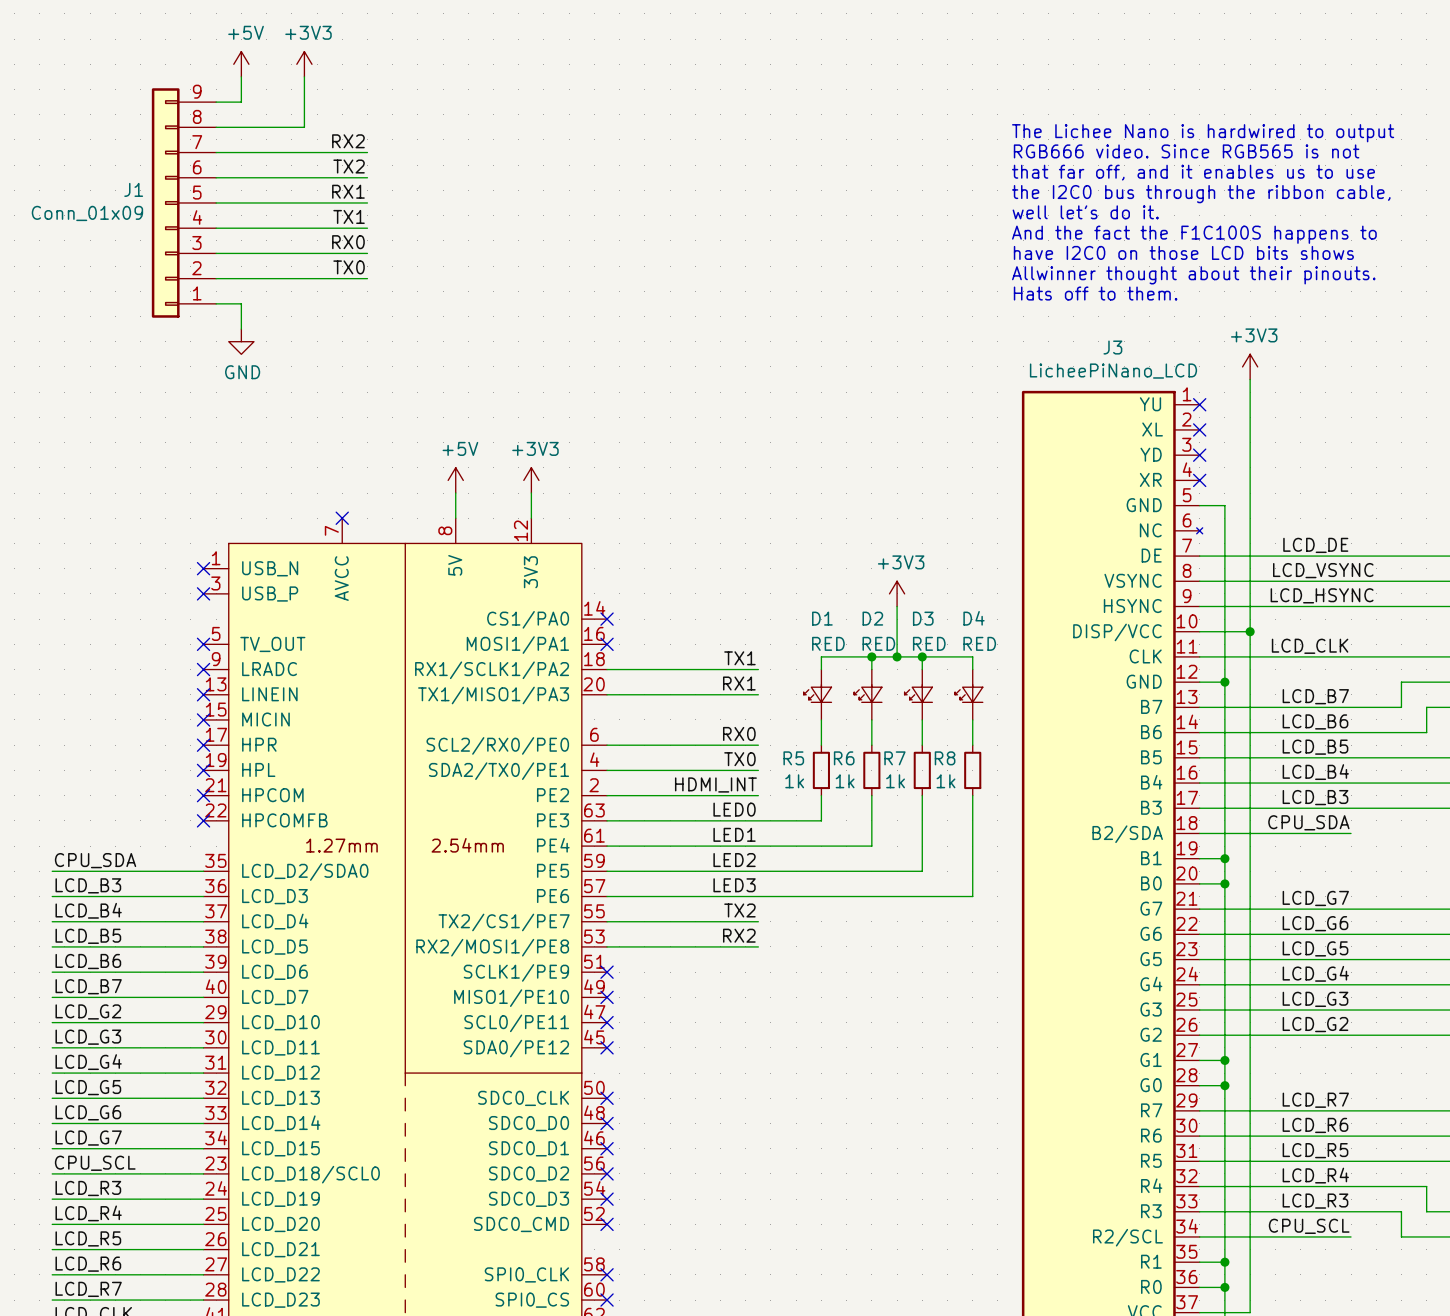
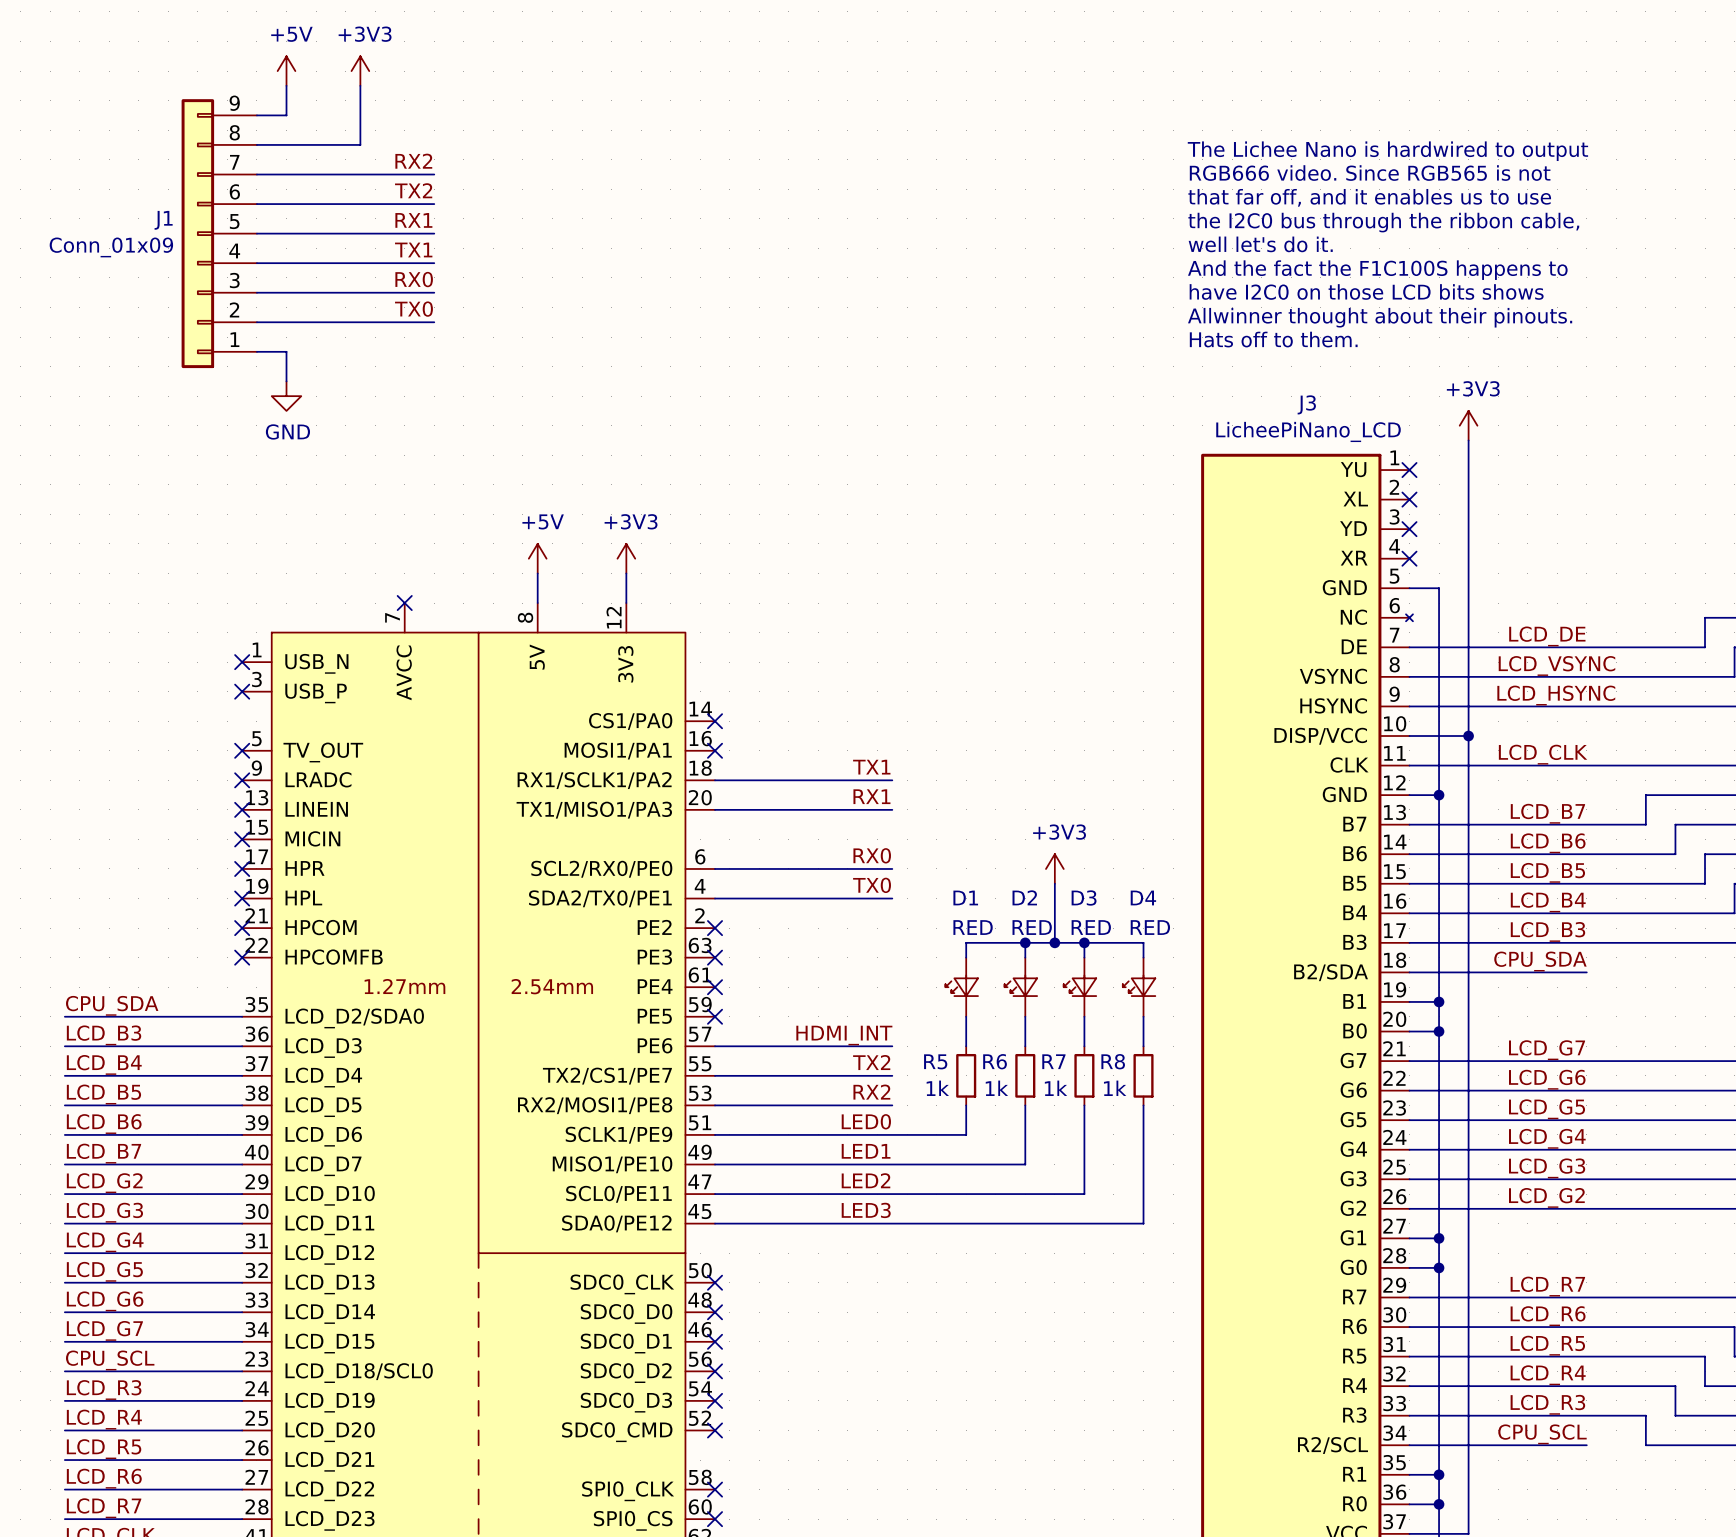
power symbol position: +3V3 (897, 593) -> +3V3 (1054, 868)
wire: (897, 606) (897, 656) -> (1054, 883) (1054, 942)
wire: (871, 656) (871, 669) -> none
junction: (871, 656) -> none
junction: (897, 656) -> none
wire: (922, 656) (922, 669) -> none
junction: (922, 656) -> none
wire: (821, 669) (821, 656) (972, 656) (972, 669) -> none
D1 position: (817, 694) -> (961, 987)
D2 position: (868, 694) -> (1020, 987)
D3 position: (918, 694) -> (1079, 987)
D4 position: (968, 694) -> (1139, 987)
wire: (821, 719) (821, 745) -> (966, 1016) (966, 1046)
wire: (871, 719) (871, 745) -> (1025, 1016) (1025, 1046)
wire: (922, 719) (922, 745) -> (1084, 1016) (1084, 1046)
wire: (972, 719) (972, 745) -> none
R5 position: (821, 770) -> (966, 1075)
R6 position: (871, 770) -> (1025, 1075)
R7 position: (922, 770) -> (1084, 1075)
R8 position: (972, 770) -> (1143, 1075)
label: HDMI_INT (715, 784) -> none
wire: (607, 795) (758, 795) -> none
no-connect mark: none -> (715, 928)
wire: (821, 795) (821, 808) -> (1143, 942) (966, 942)
wire: (871, 795) (871, 808) -> none
wire: (922, 795) (922, 808) -> none
wire: (972, 795) (972, 808) -> none
junction: none -> (1025, 942)
junction: none -> (1054, 942)
junction: none -> (1084, 942)
label position: LED0 (734, 809) -> LED0 (866, 1121)
wire: (607, 820) (821, 820) -> none
no-connect mark: none -> (715, 957)
wire: (871, 820) (871, 846) (607, 846) -> none
wire: (922, 820) (922, 871) (607, 871) -> none
label position: LED1 (734, 834) -> LED1 (866, 1151)
no-connect mark: none -> (715, 987)
label position: LED2 (734, 860) -> LED2 (866, 1180)
no-connect mark: none -> (715, 1016)
label: LED3 (734, 885) -> HDMI_INT (844, 1035)
wire: (758, 896) (972, 896) -> none
wire: none -> (966, 1105) (966, 1134) (715, 1134)
wire: none -> (1025, 1105) (1025, 1164) (715, 1164)
wire: none -> (1084, 1105) (1084, 1194) (715, 1194)
wire: none -> (1143, 1105) (1143, 1223) (715, 1223)
no-connect mark: (607, 972) -> none
no-connect mark: (607, 997) -> none
no-connect mark: (607, 1022) -> none
label: none -> LED3 (866, 1210)
no-connect mark: (607, 1047) -> none

